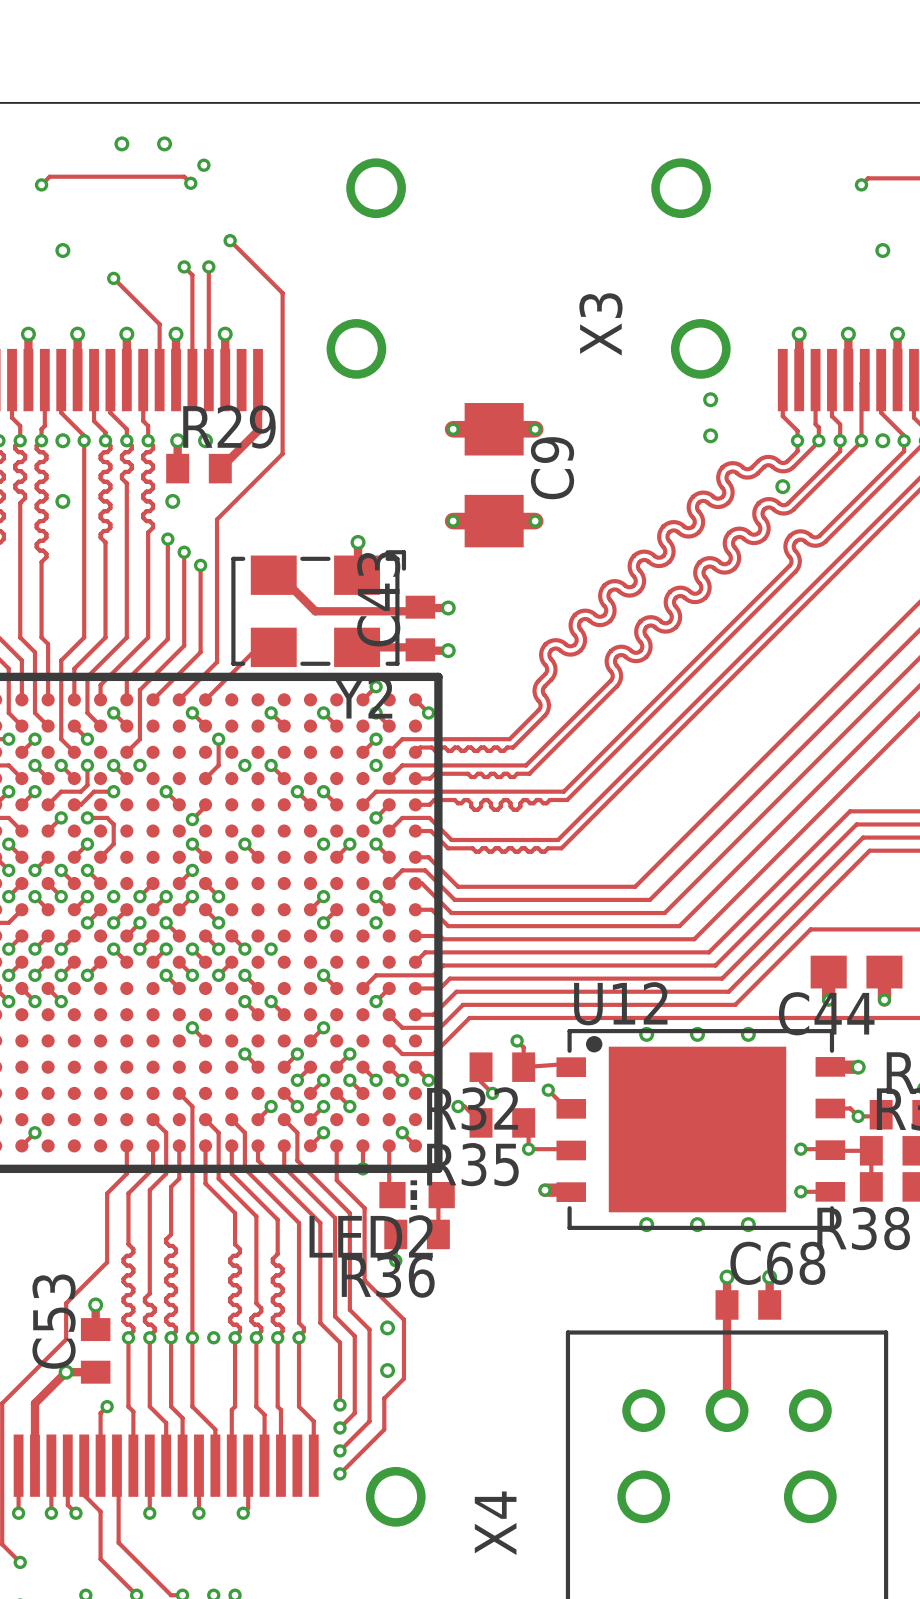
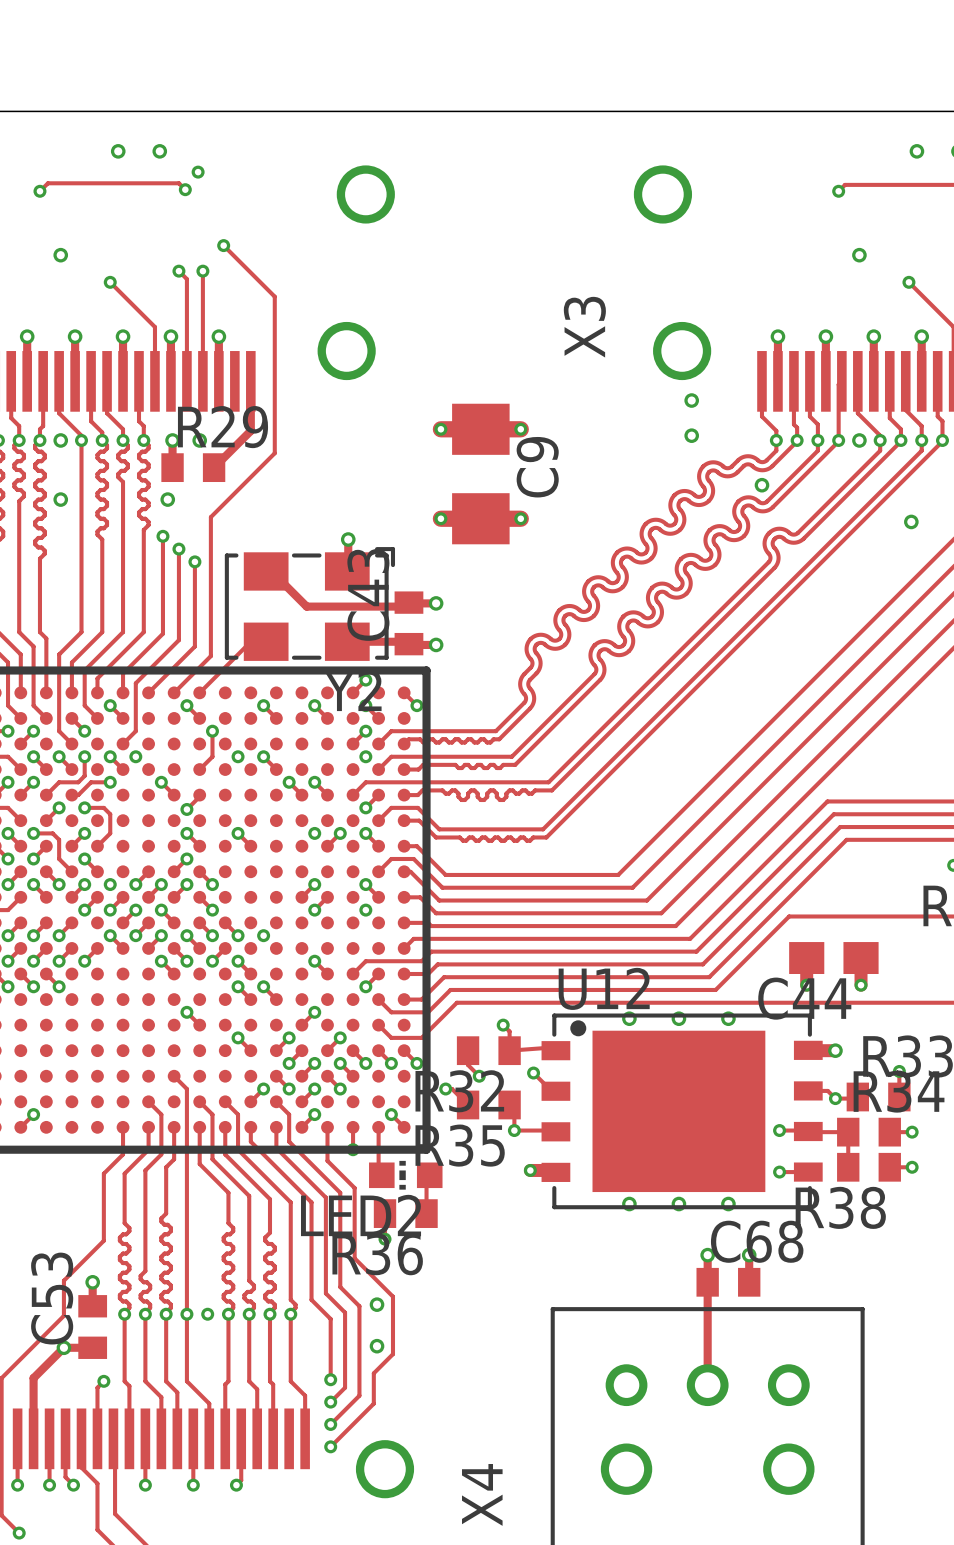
track: none -> (33, 833) (52, 833) (59, 839) (59, 858)
via position: (61, 870) -> (33, 833)

